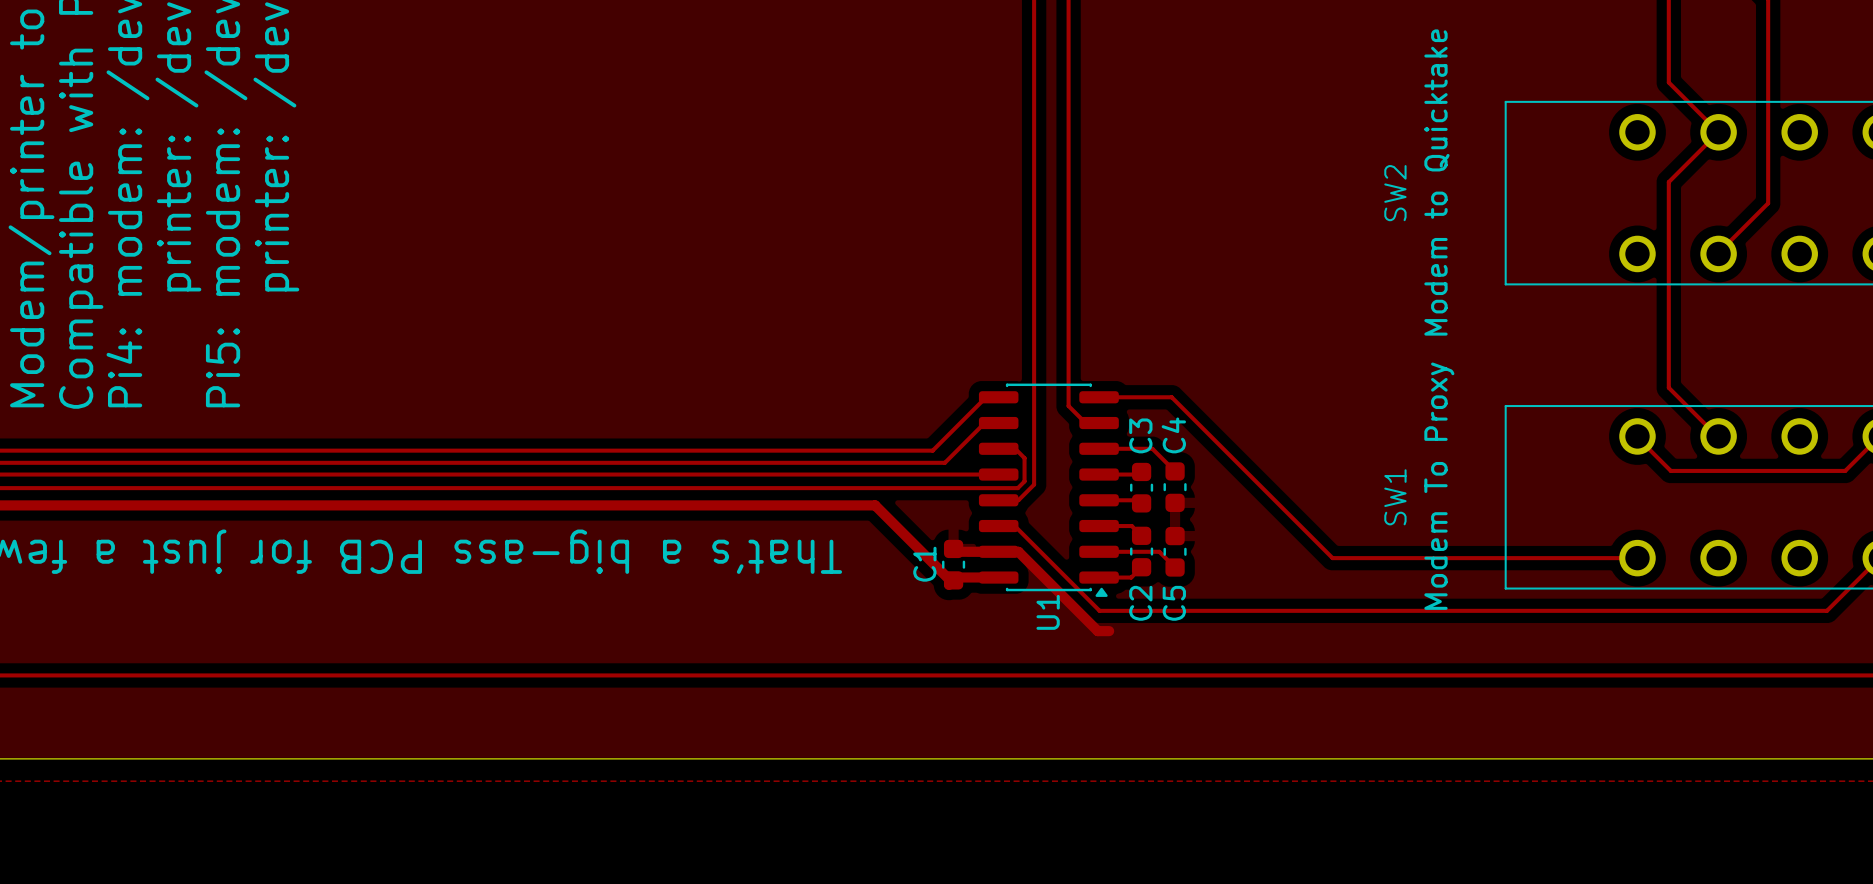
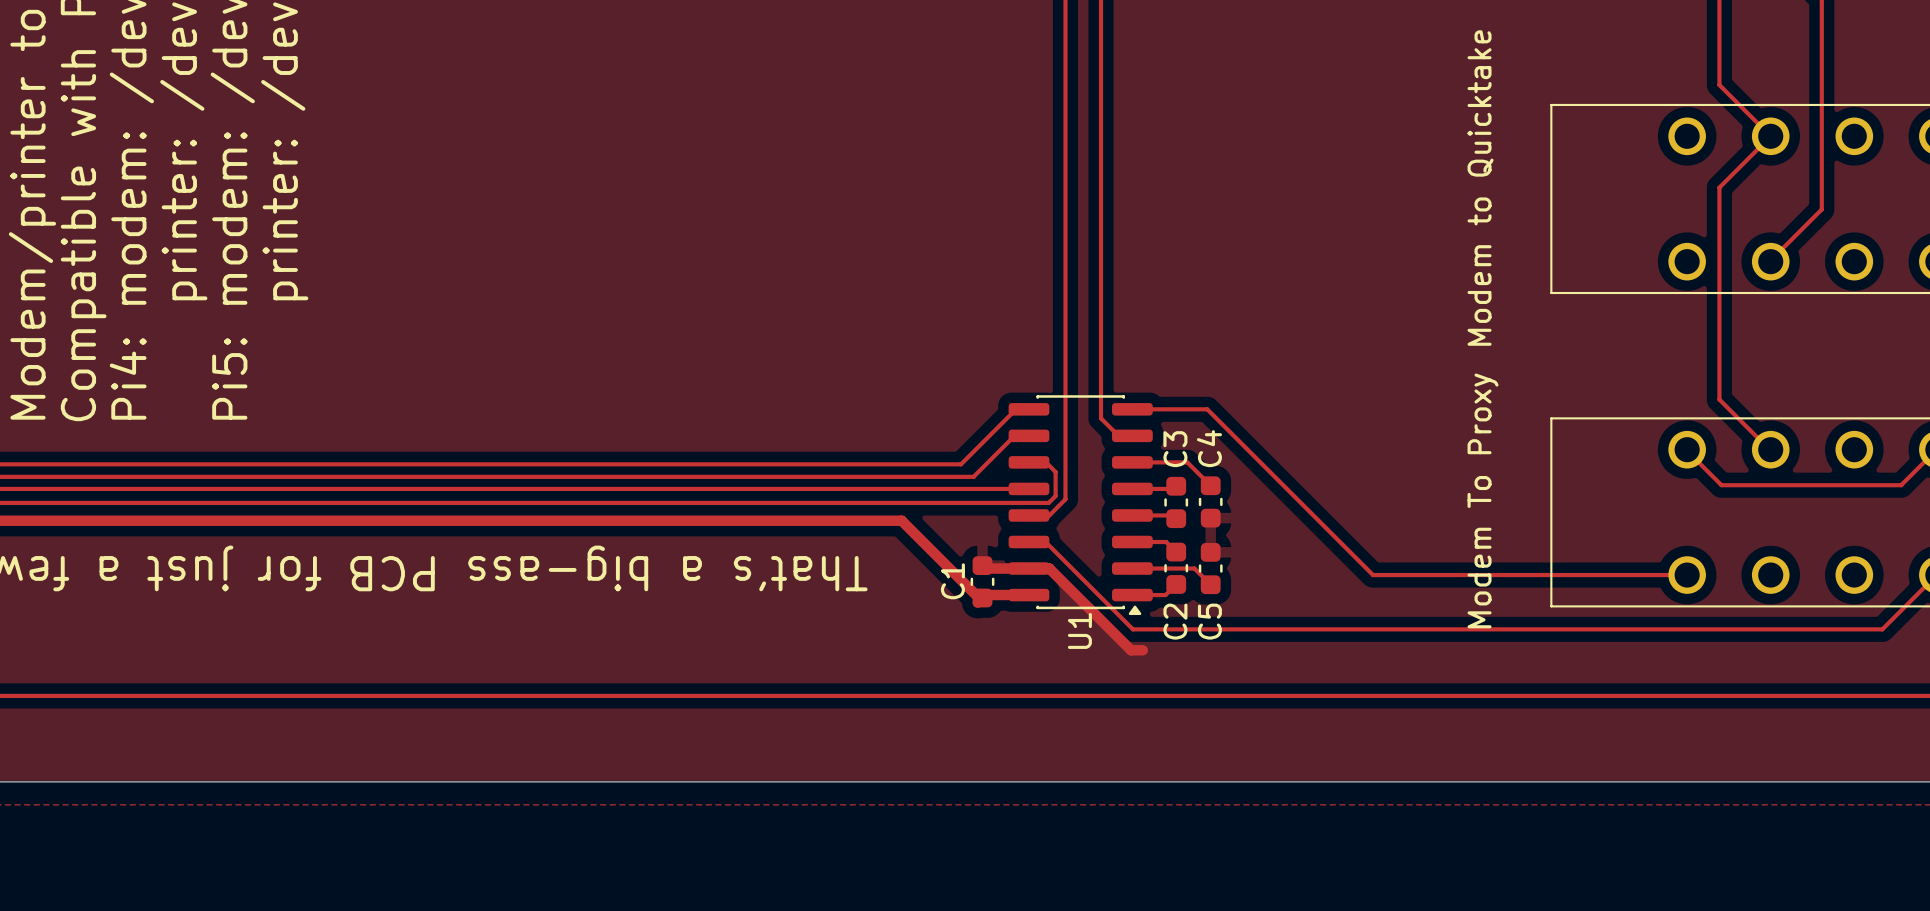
SW2 name: SW2 (1395, 193) -> none
SW1 name: SW1 (1395, 497) -> none

